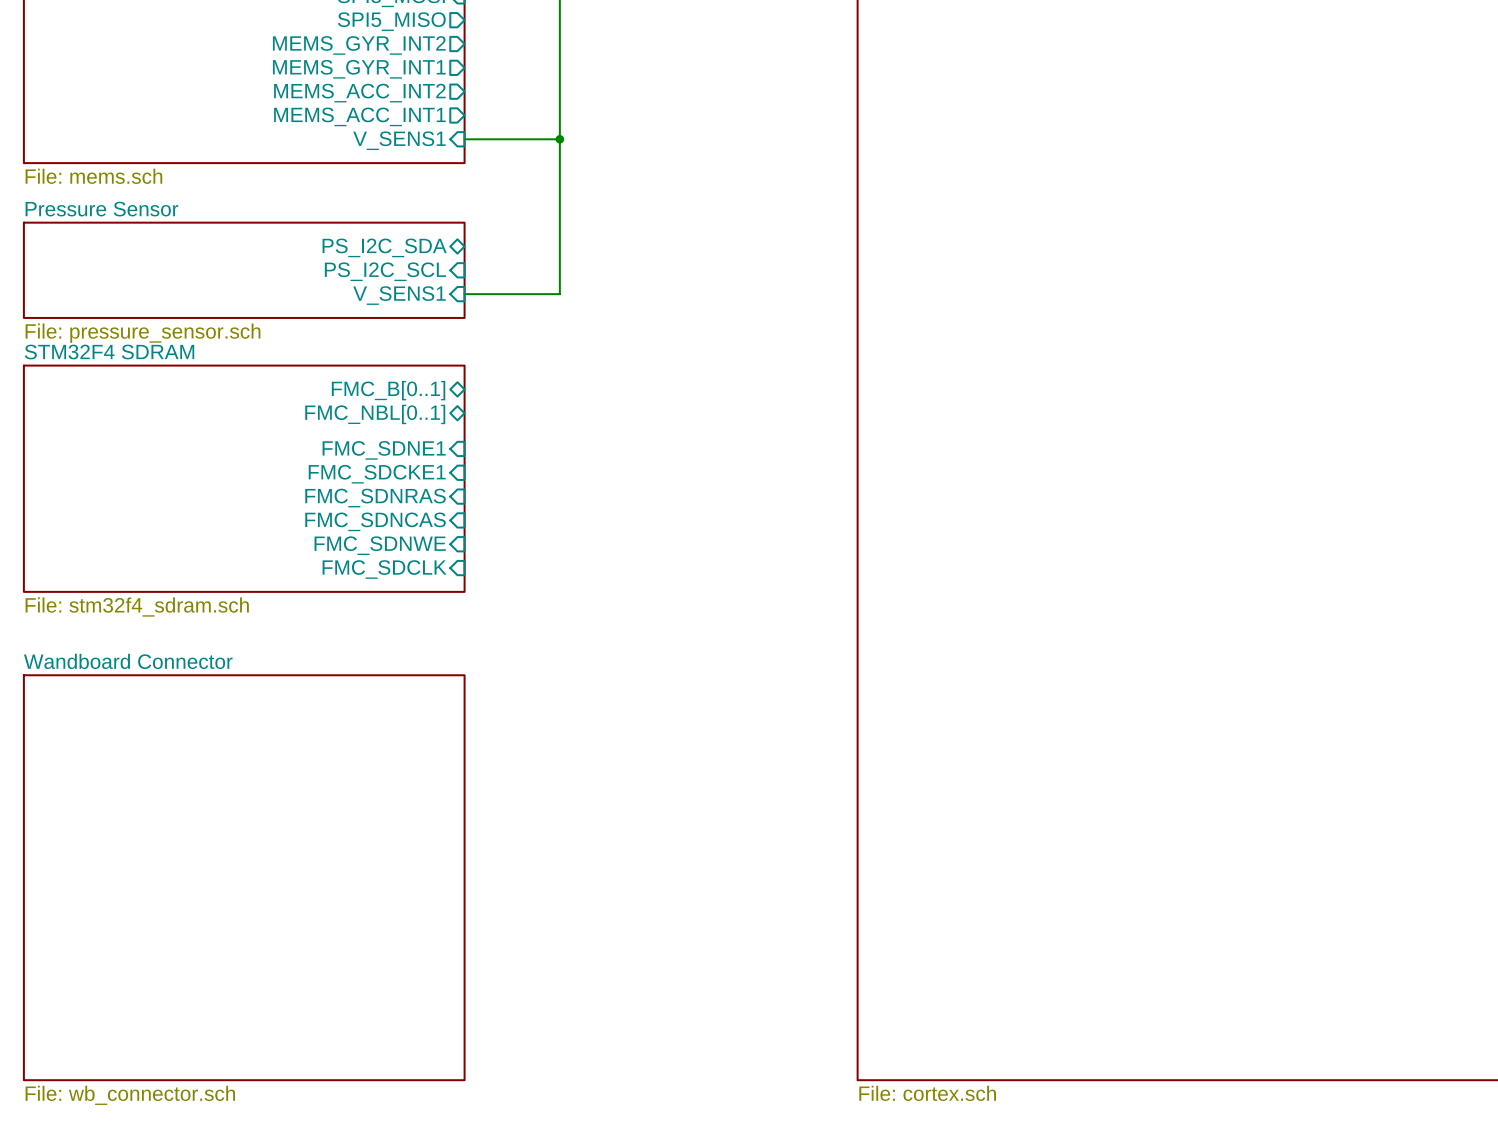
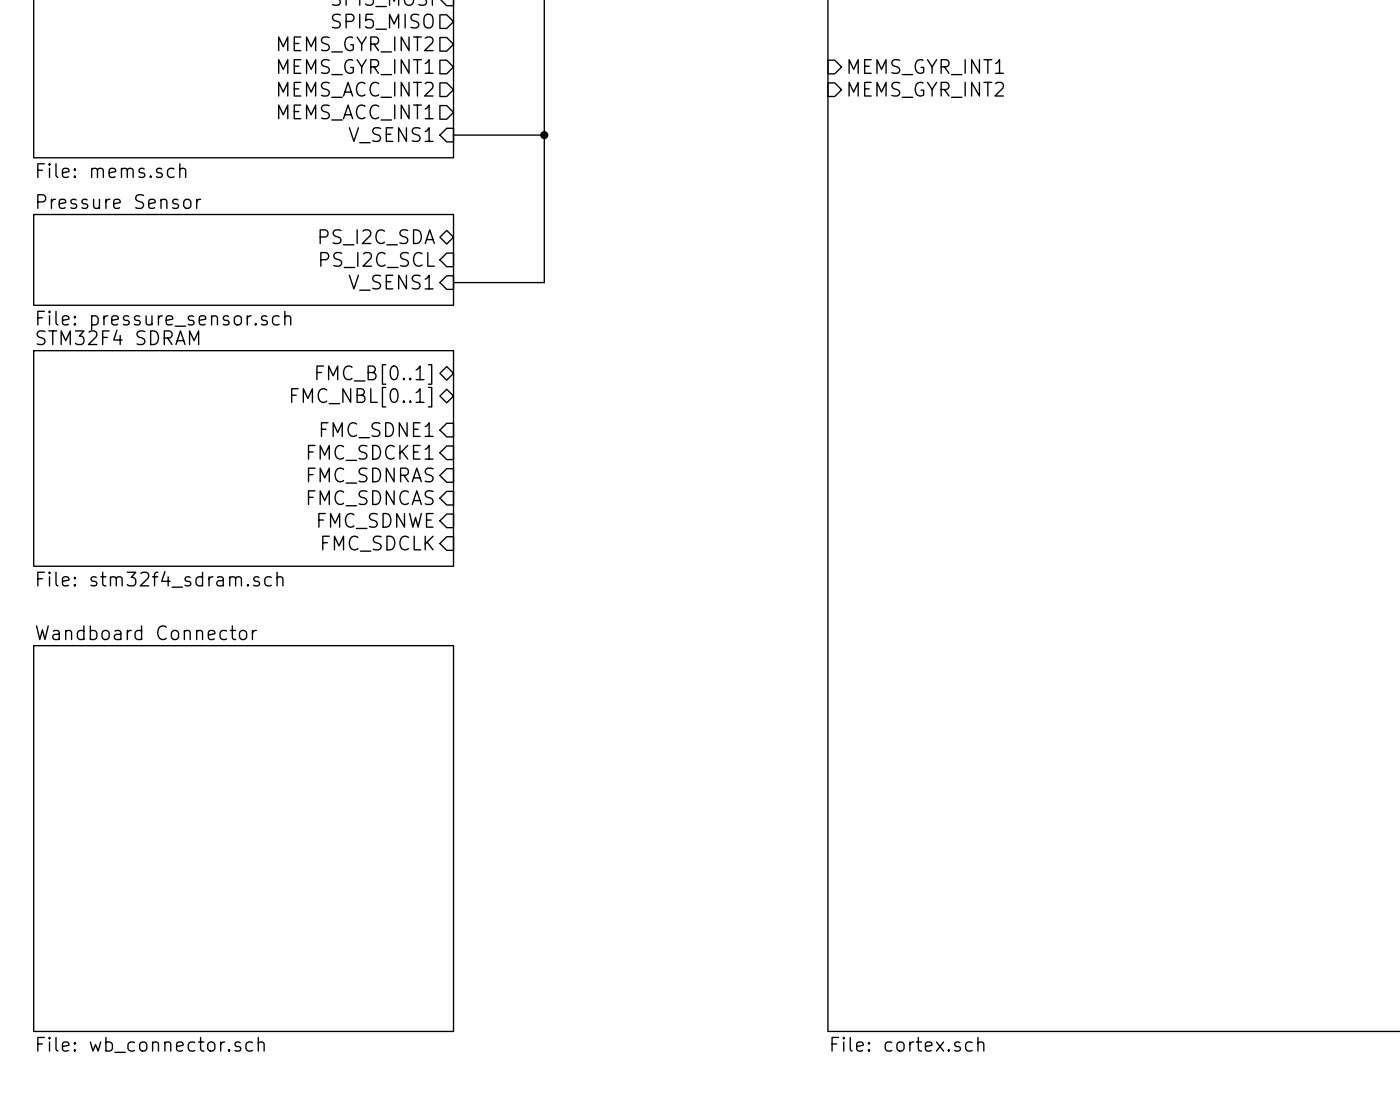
sheet pin: none -> MEMS_GYR_INT1 (926, 67)
sheet pin: none -> MEMS_GYR_INT2 (926, 89)

